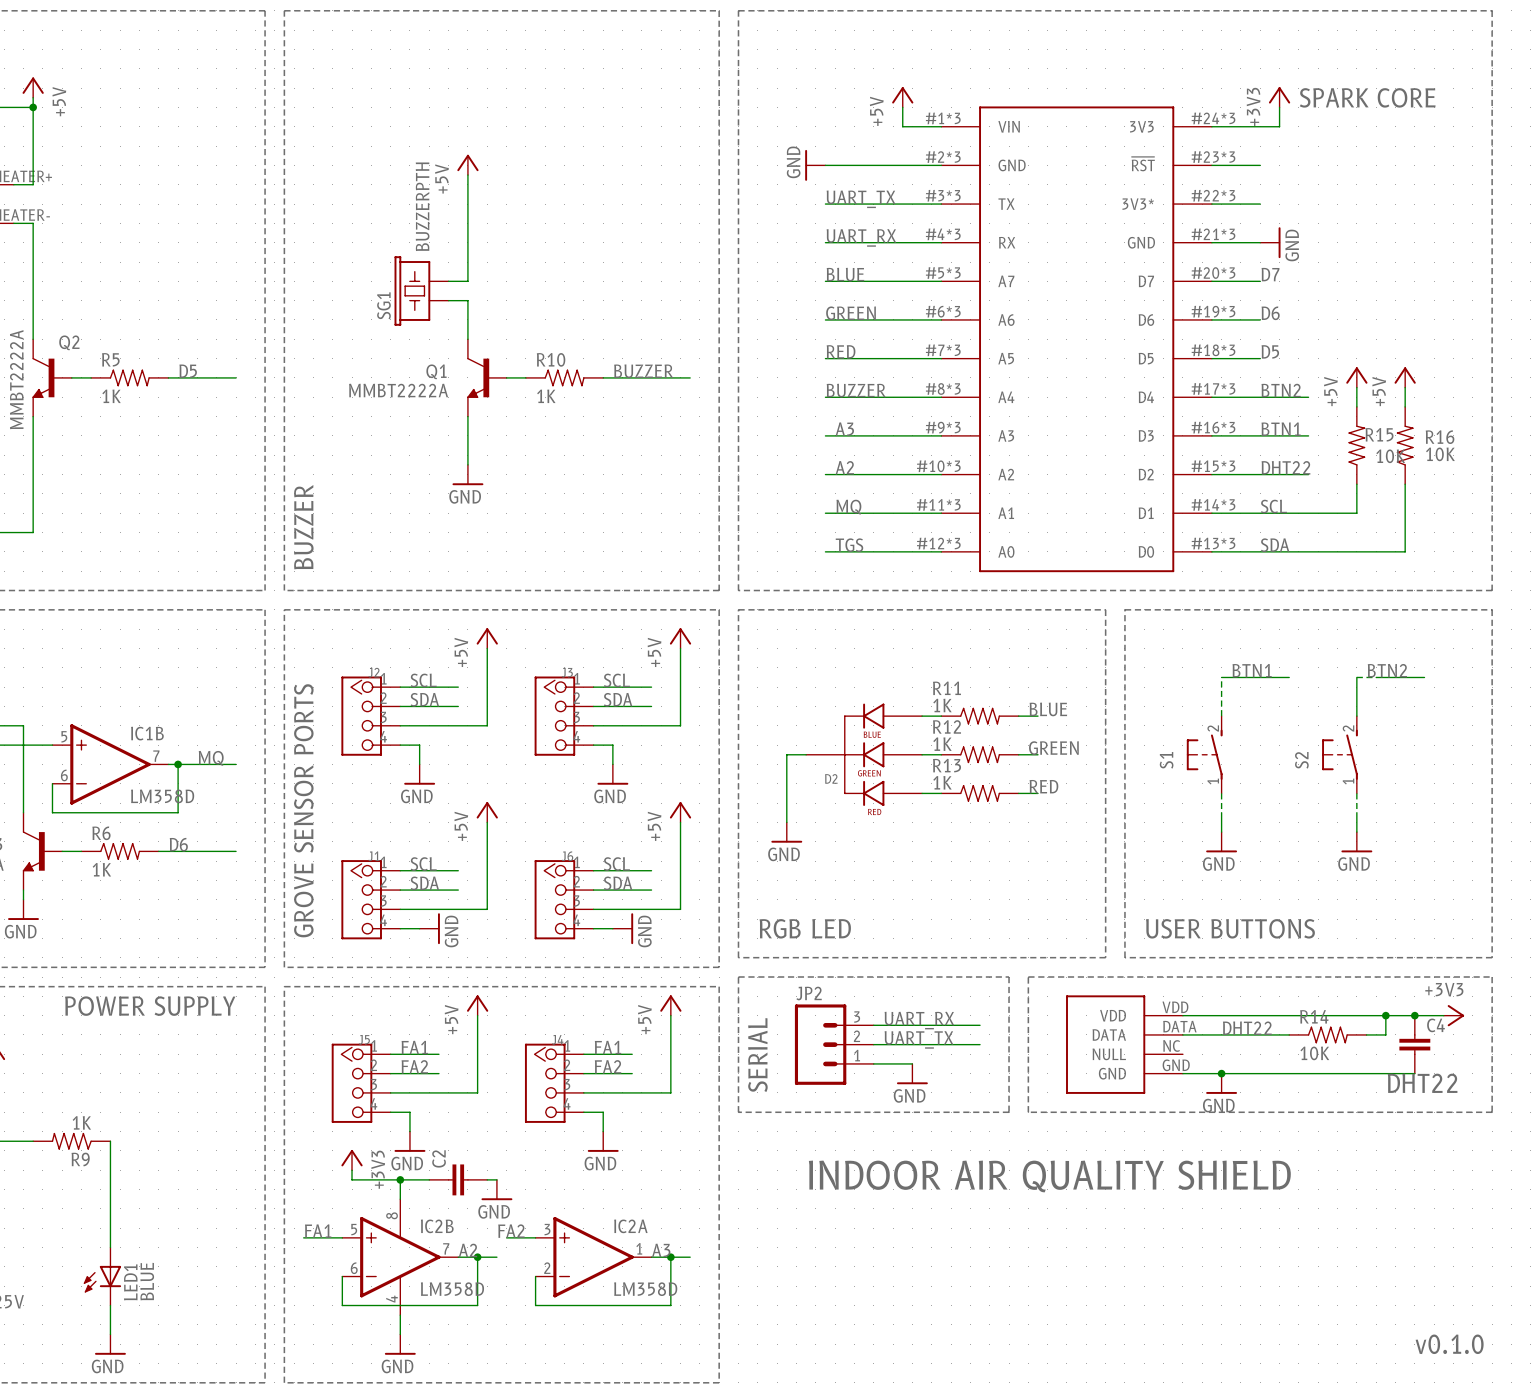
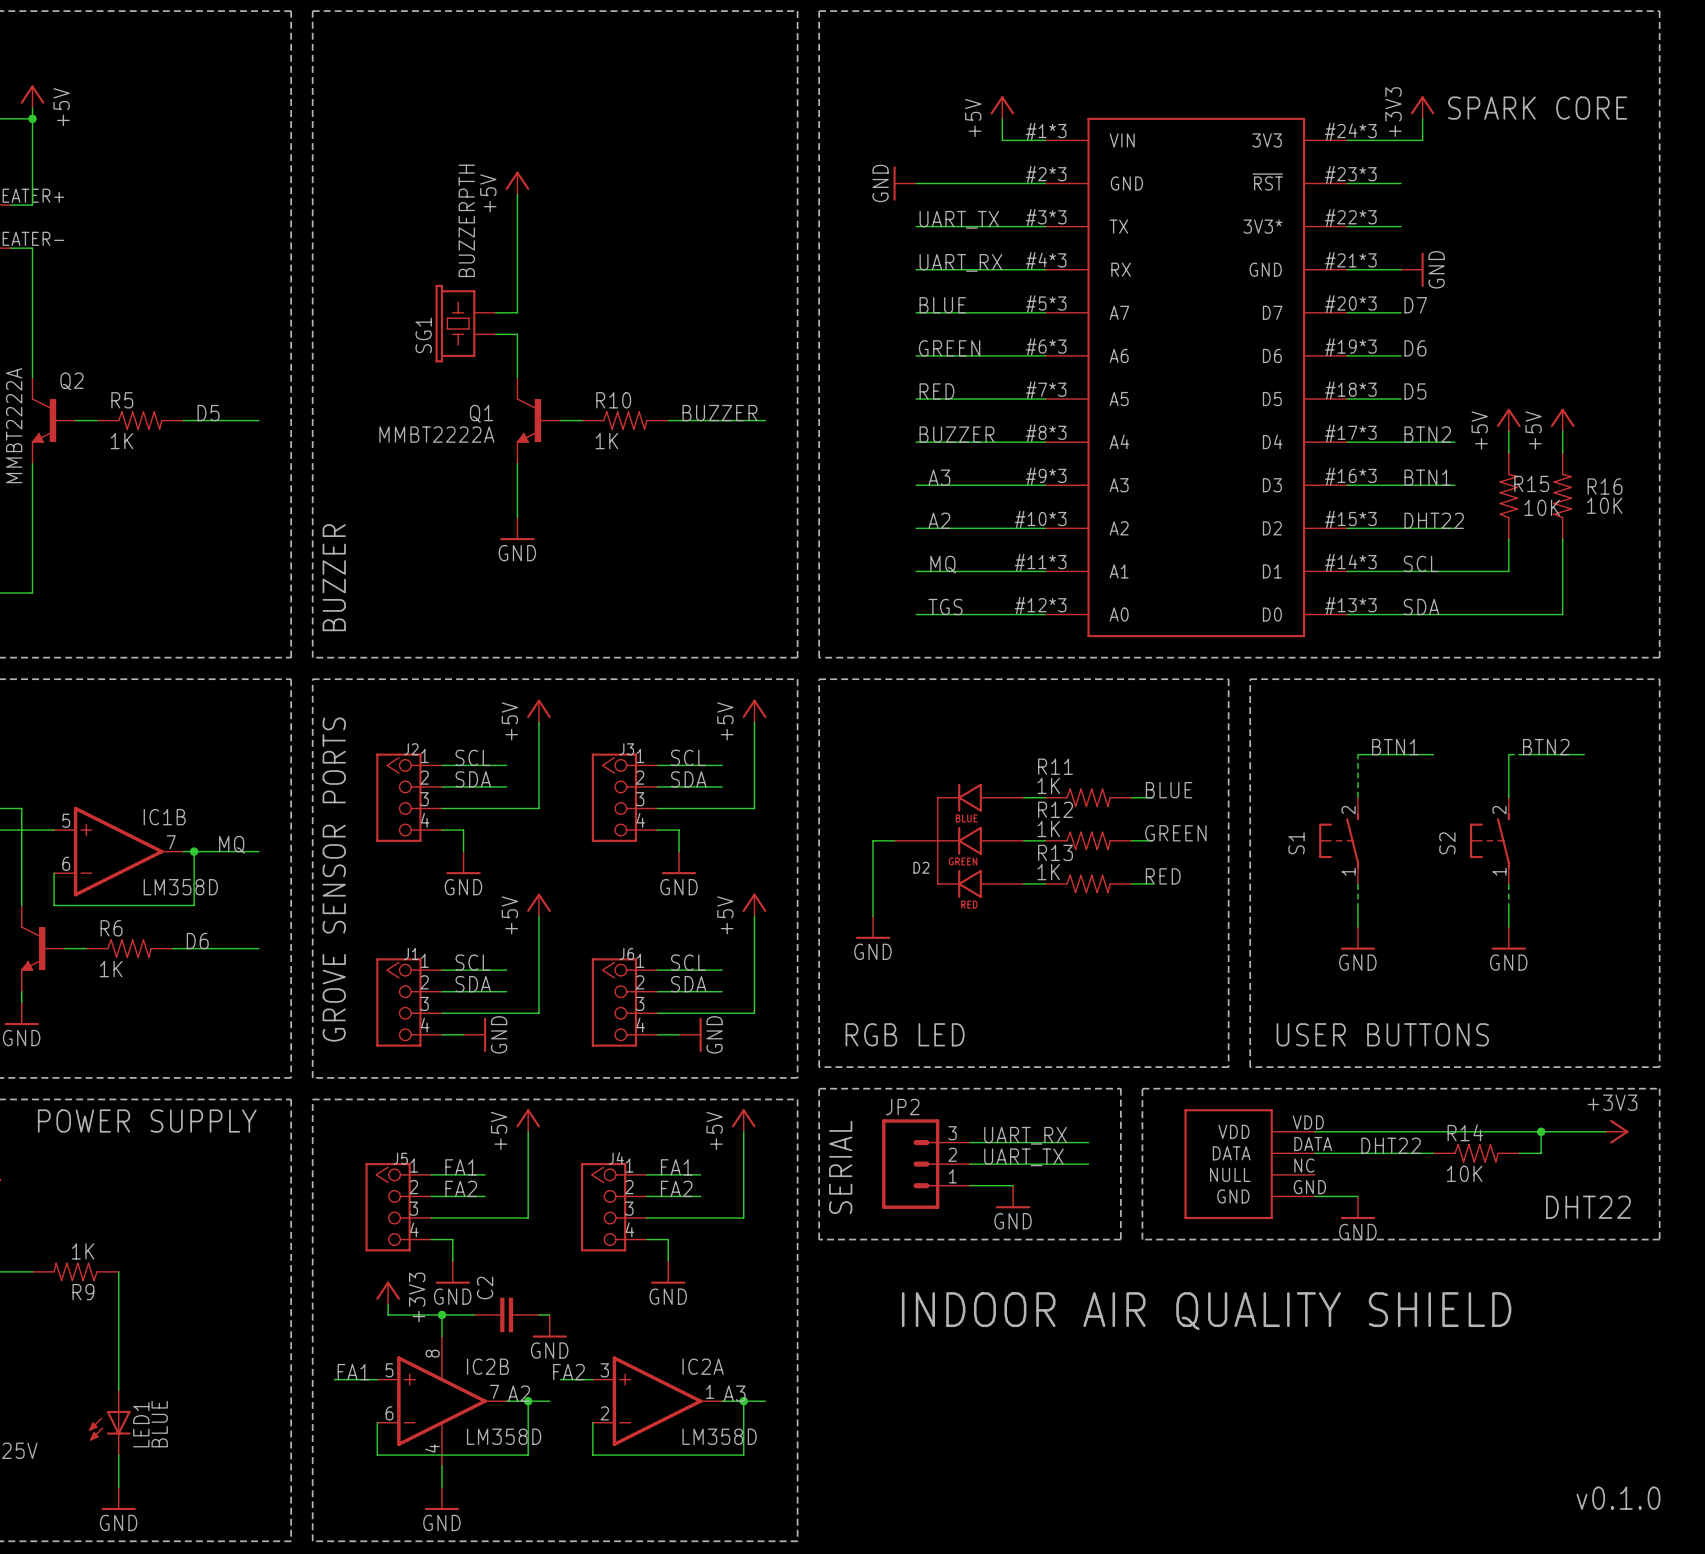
junction: (1414, 1015) -> none
C4: (1414, 1044) -> none
wire: (1221, 1073) (1414, 1073) -> none
junction: (1221, 1073) -> none

